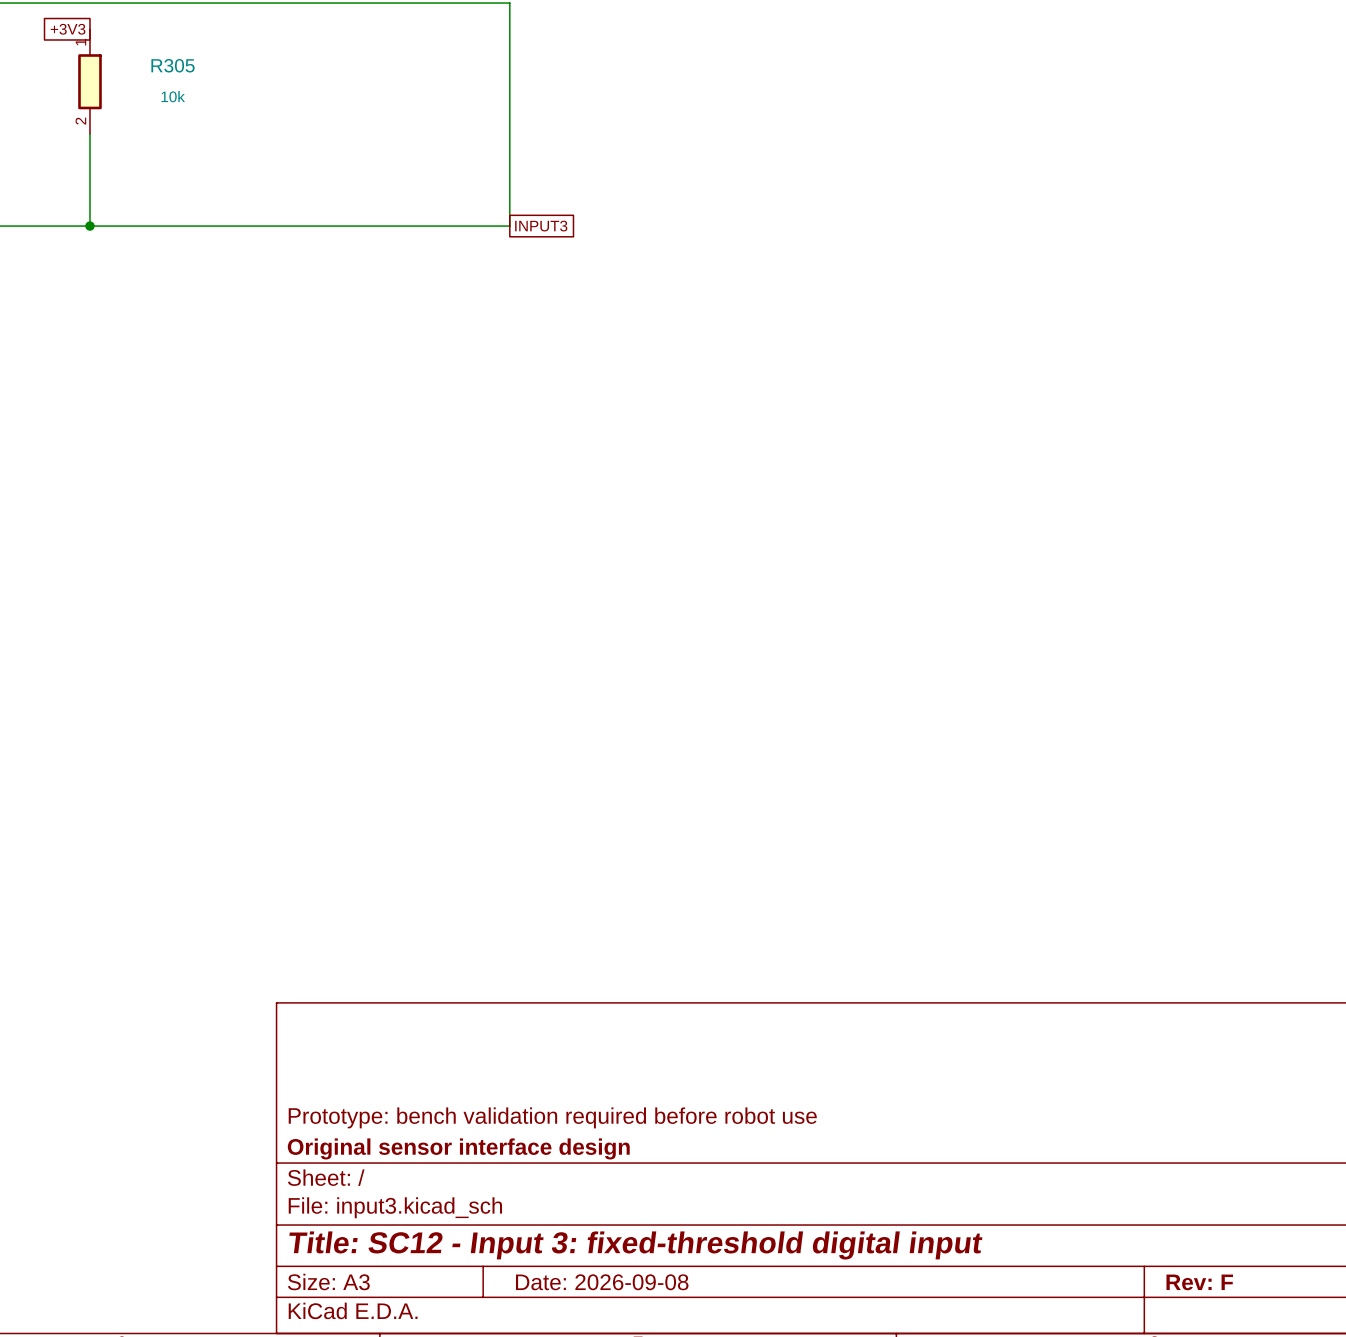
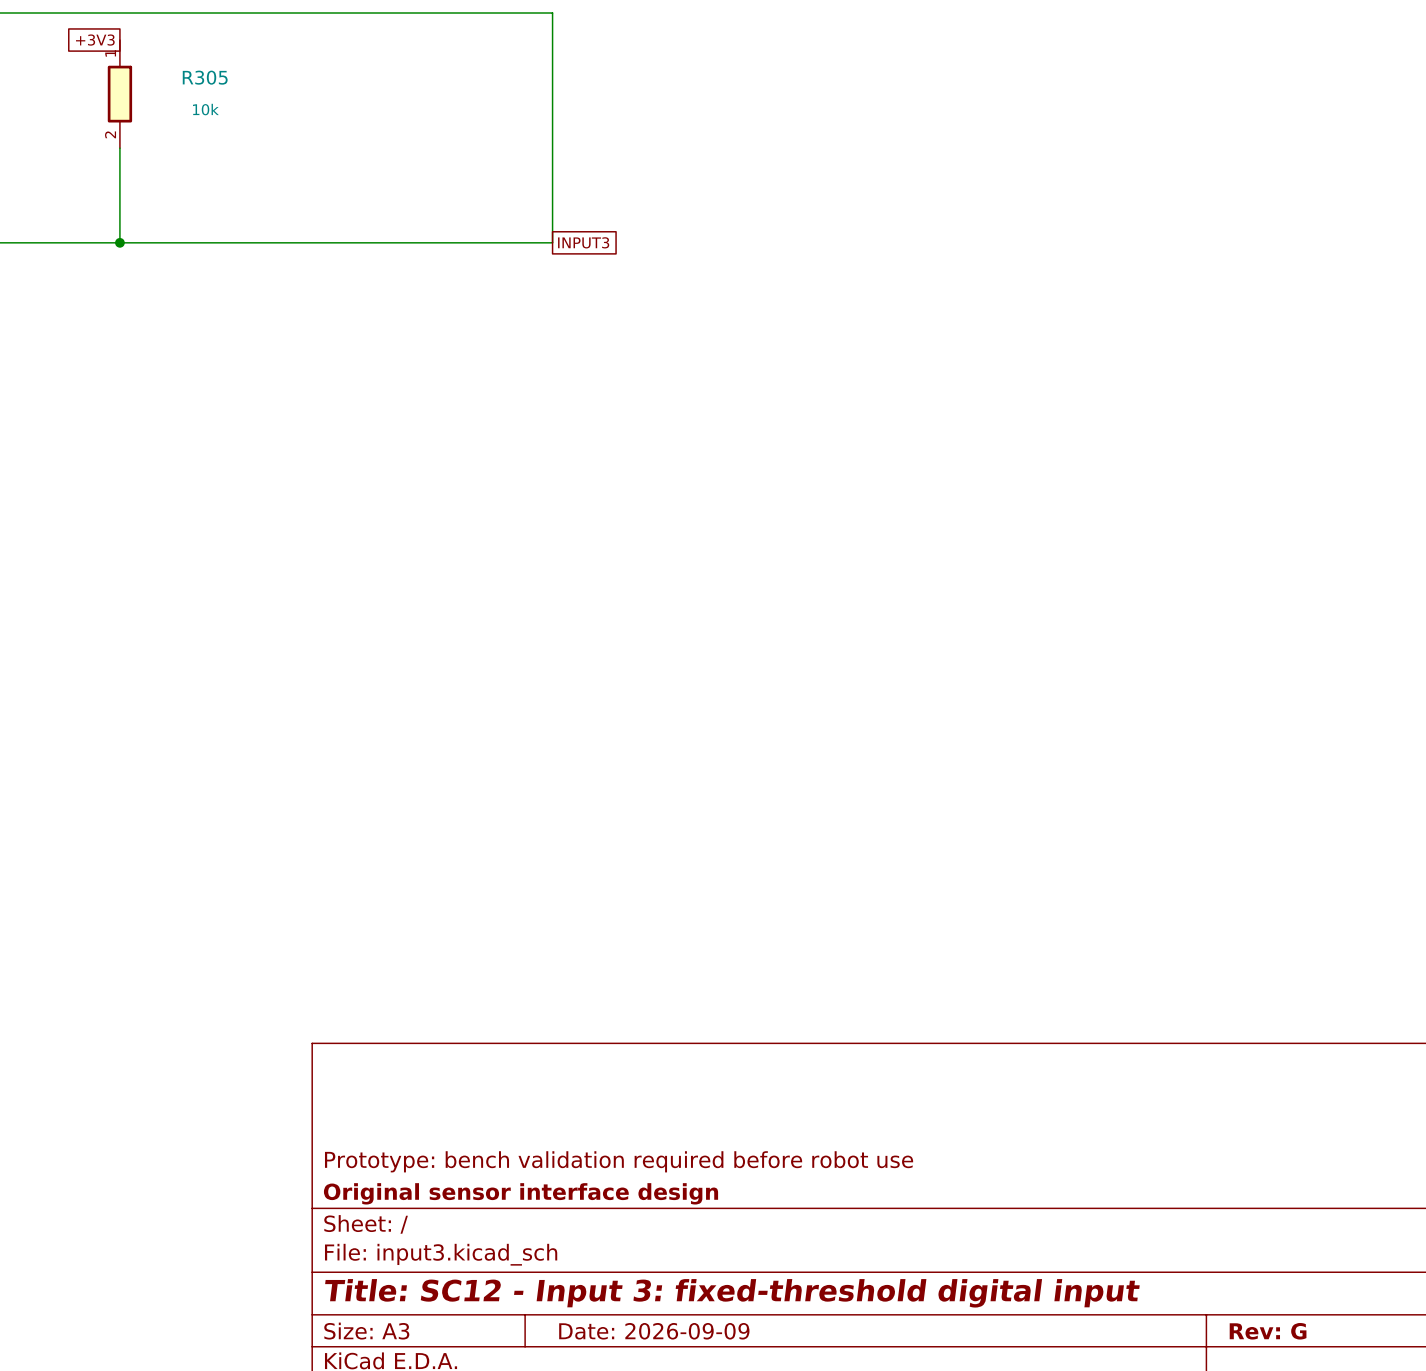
title block: Date: 2026-09-08 (602, 1282) -> Date: 2026-09-09 (654, 1331)
title block: Rev: F (1199, 1282) -> Rev: G (1268, 1331)

